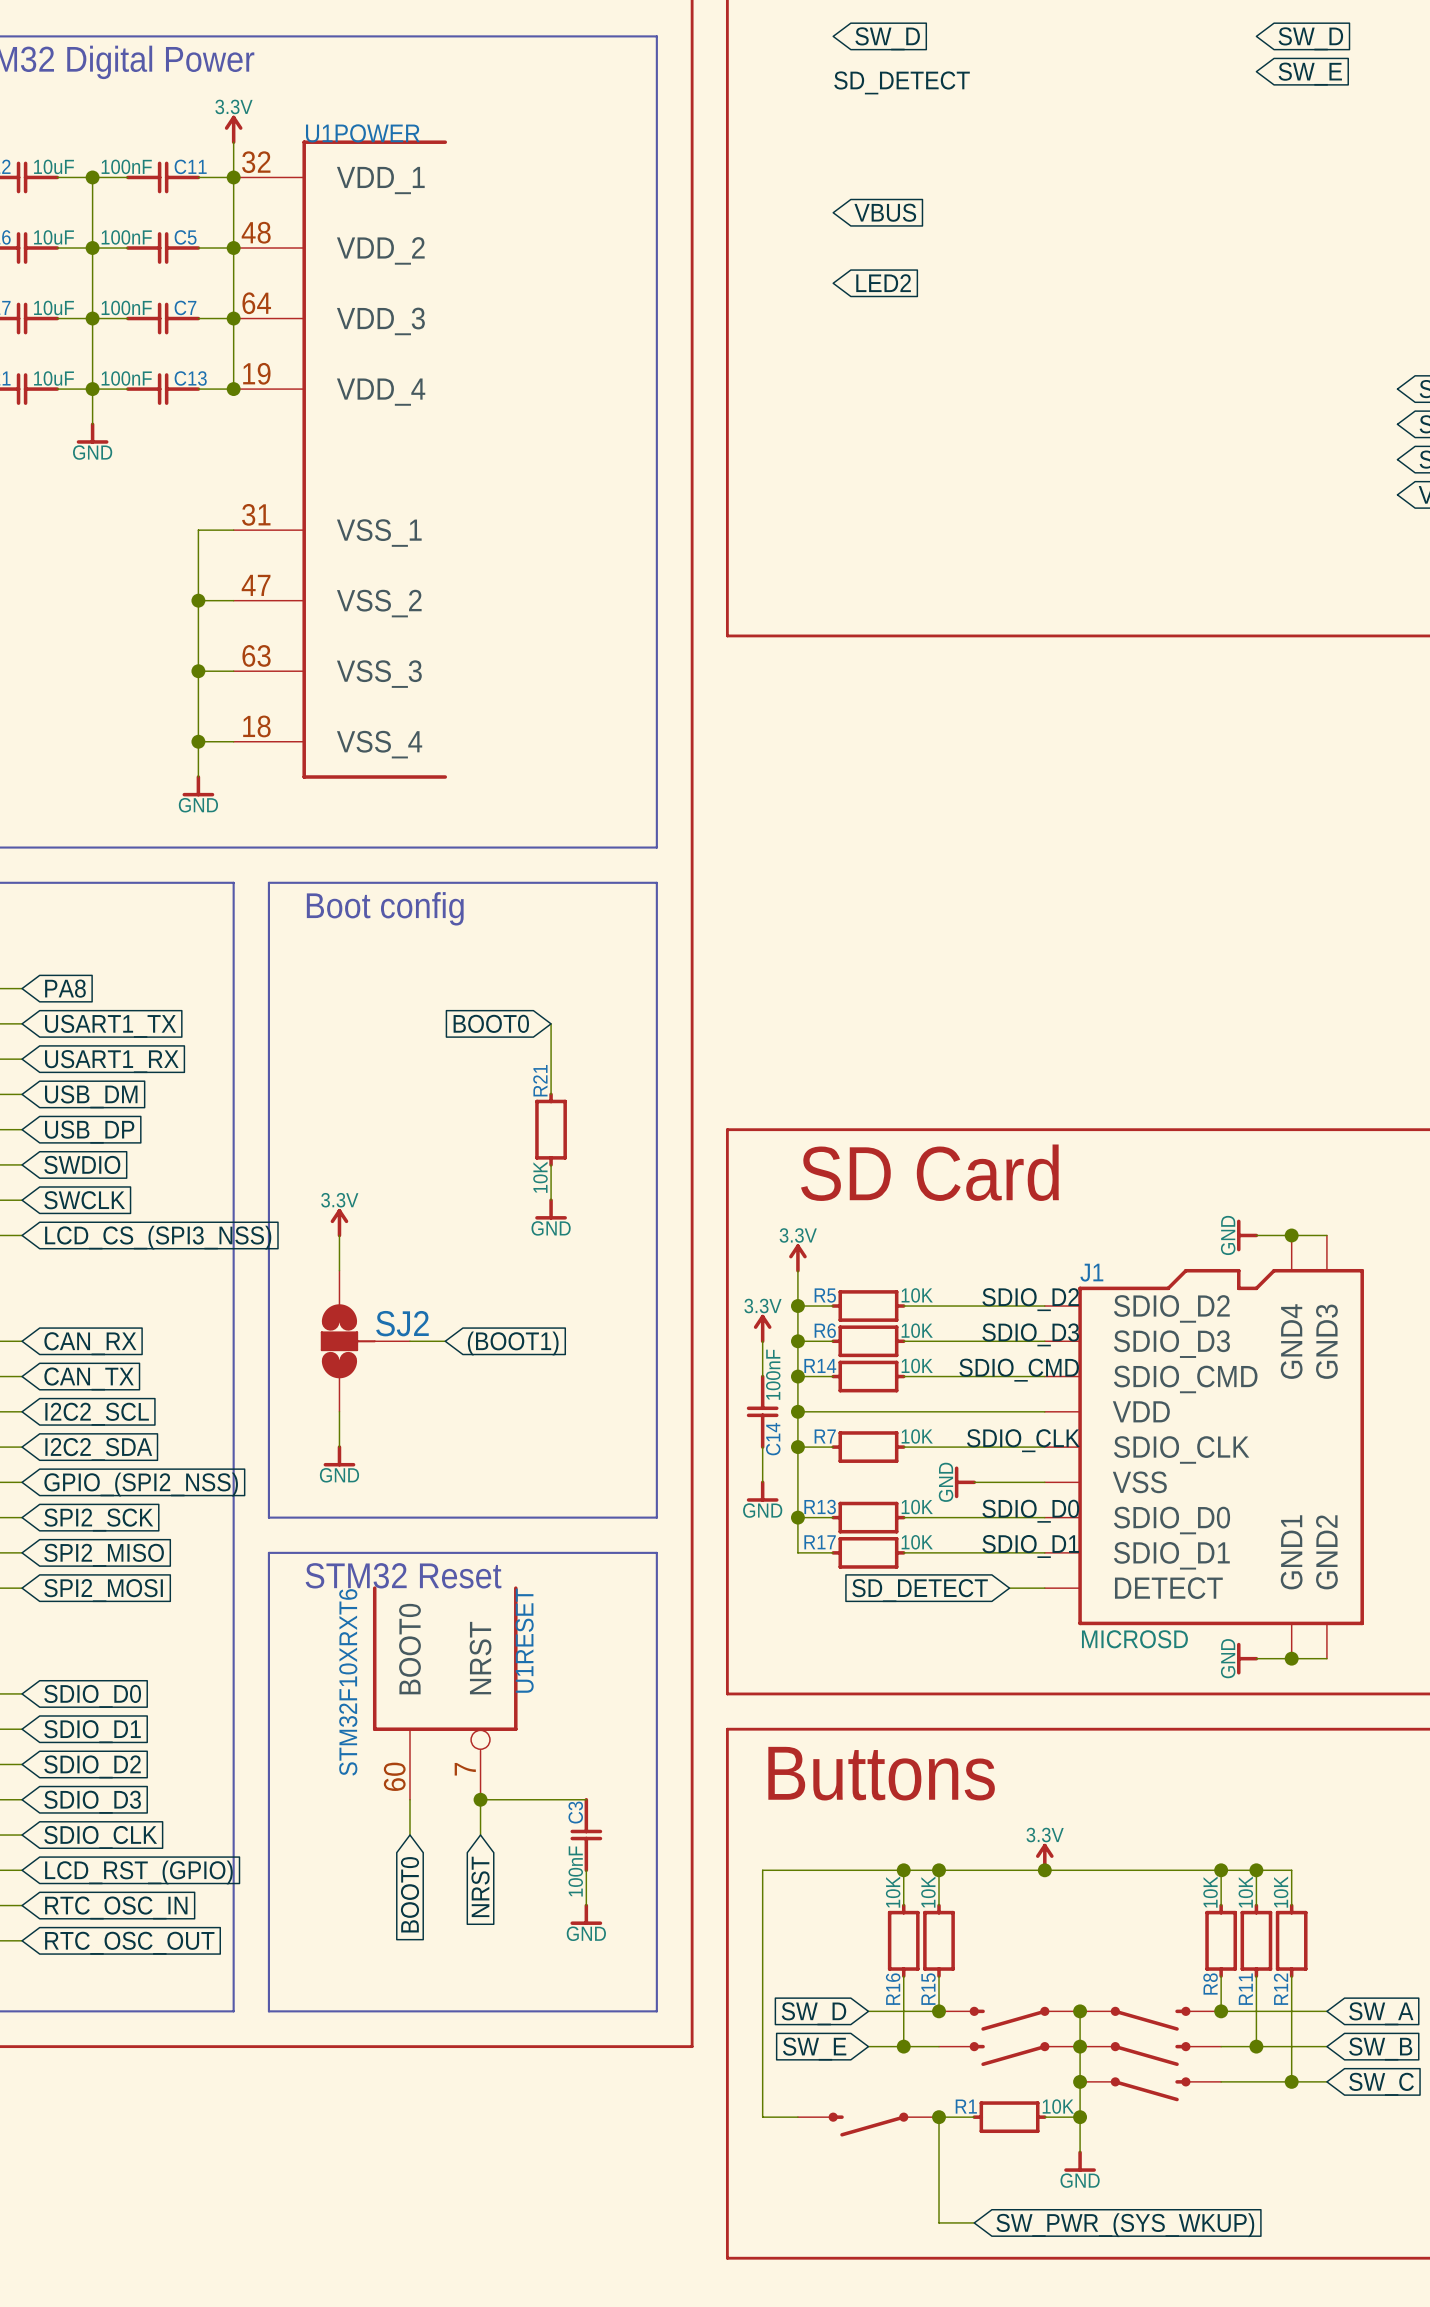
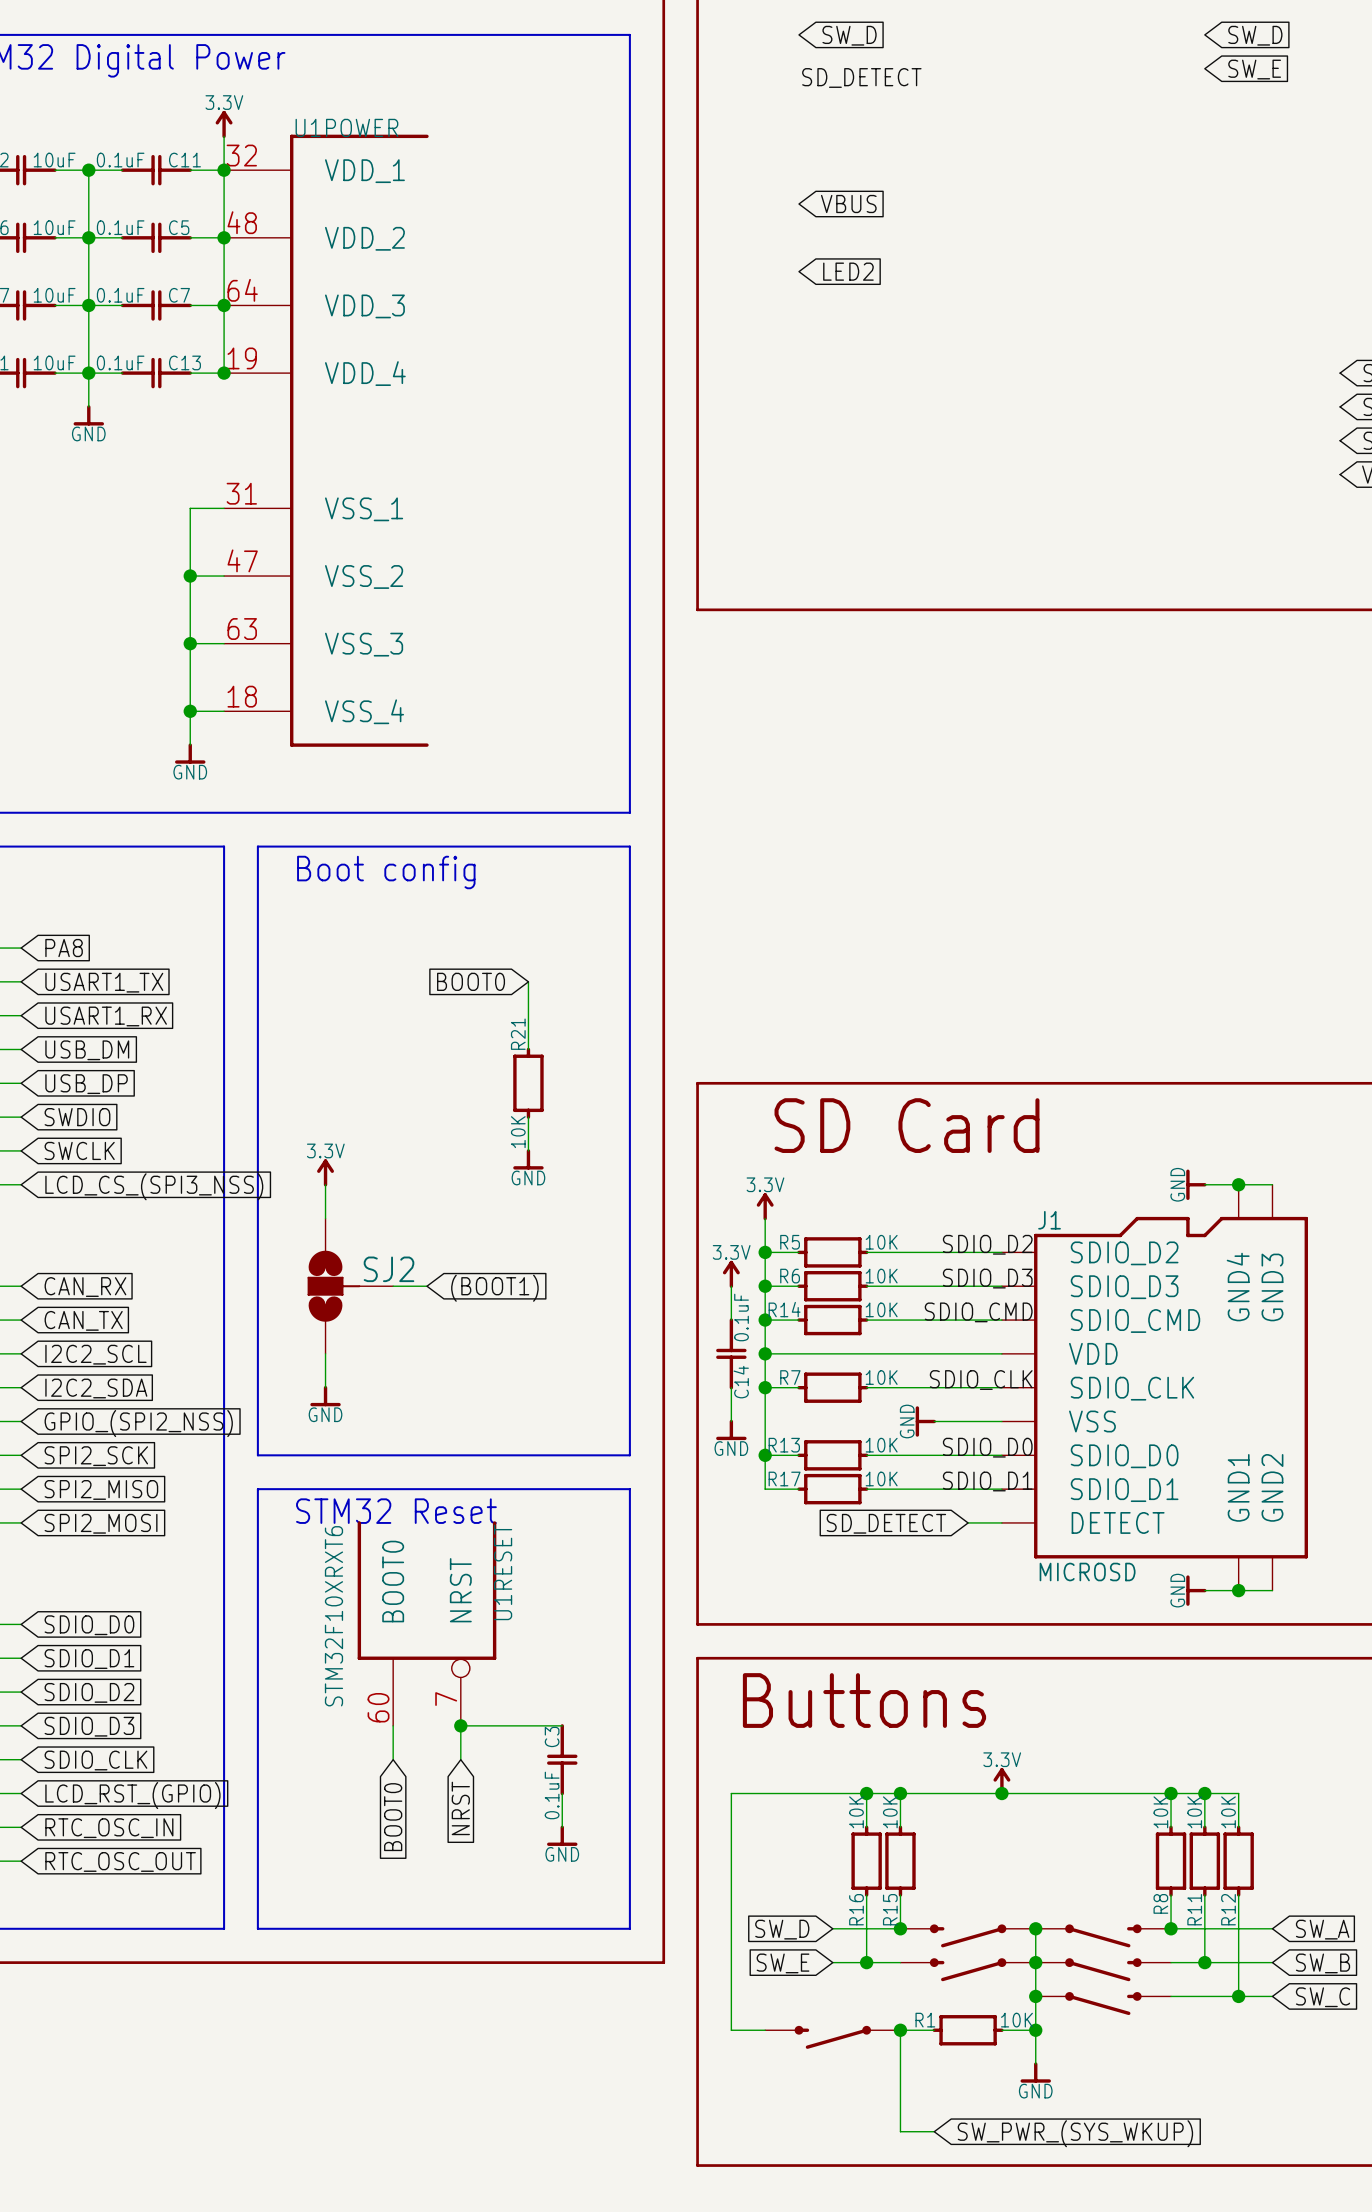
C11 value: 100nF (126, 166) -> 0.1uF (120, 160)
C5 value: 100nF (126, 237) -> 0.1uF (120, 227)
C7 value: 100nF (126, 307) -> 0.1uF (120, 295)
C13 value: 100nF (126, 378) -> 0.1uF (120, 362)
C14 value: 100nF (773, 1374) -> 0.1uF (741, 1317)
C3 value: 100nF (575, 1871) -> 0.1uF (552, 1795)

